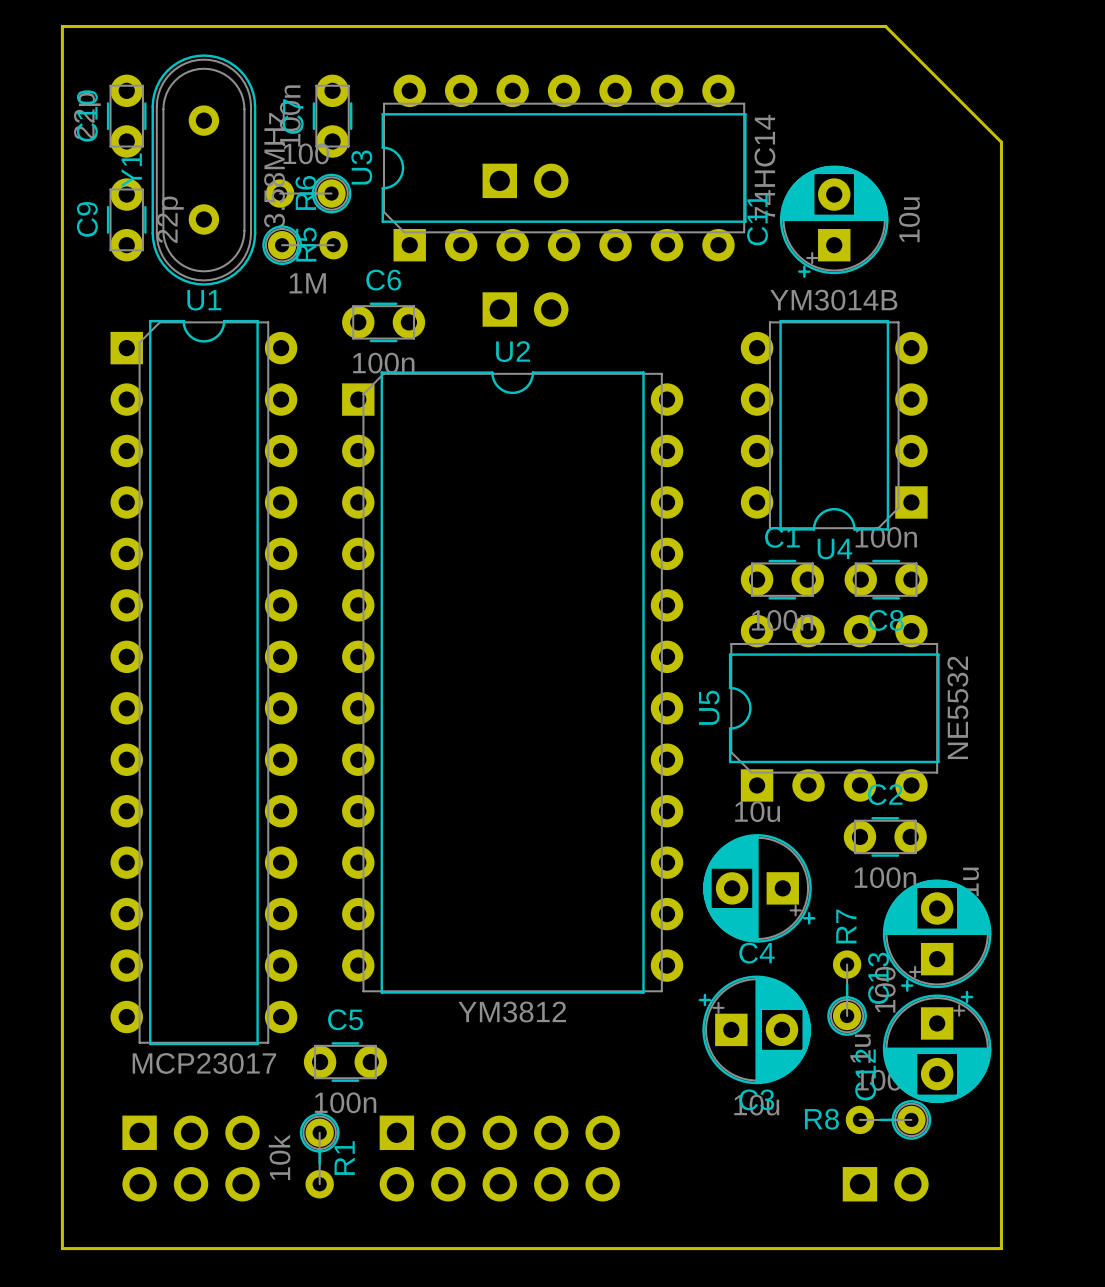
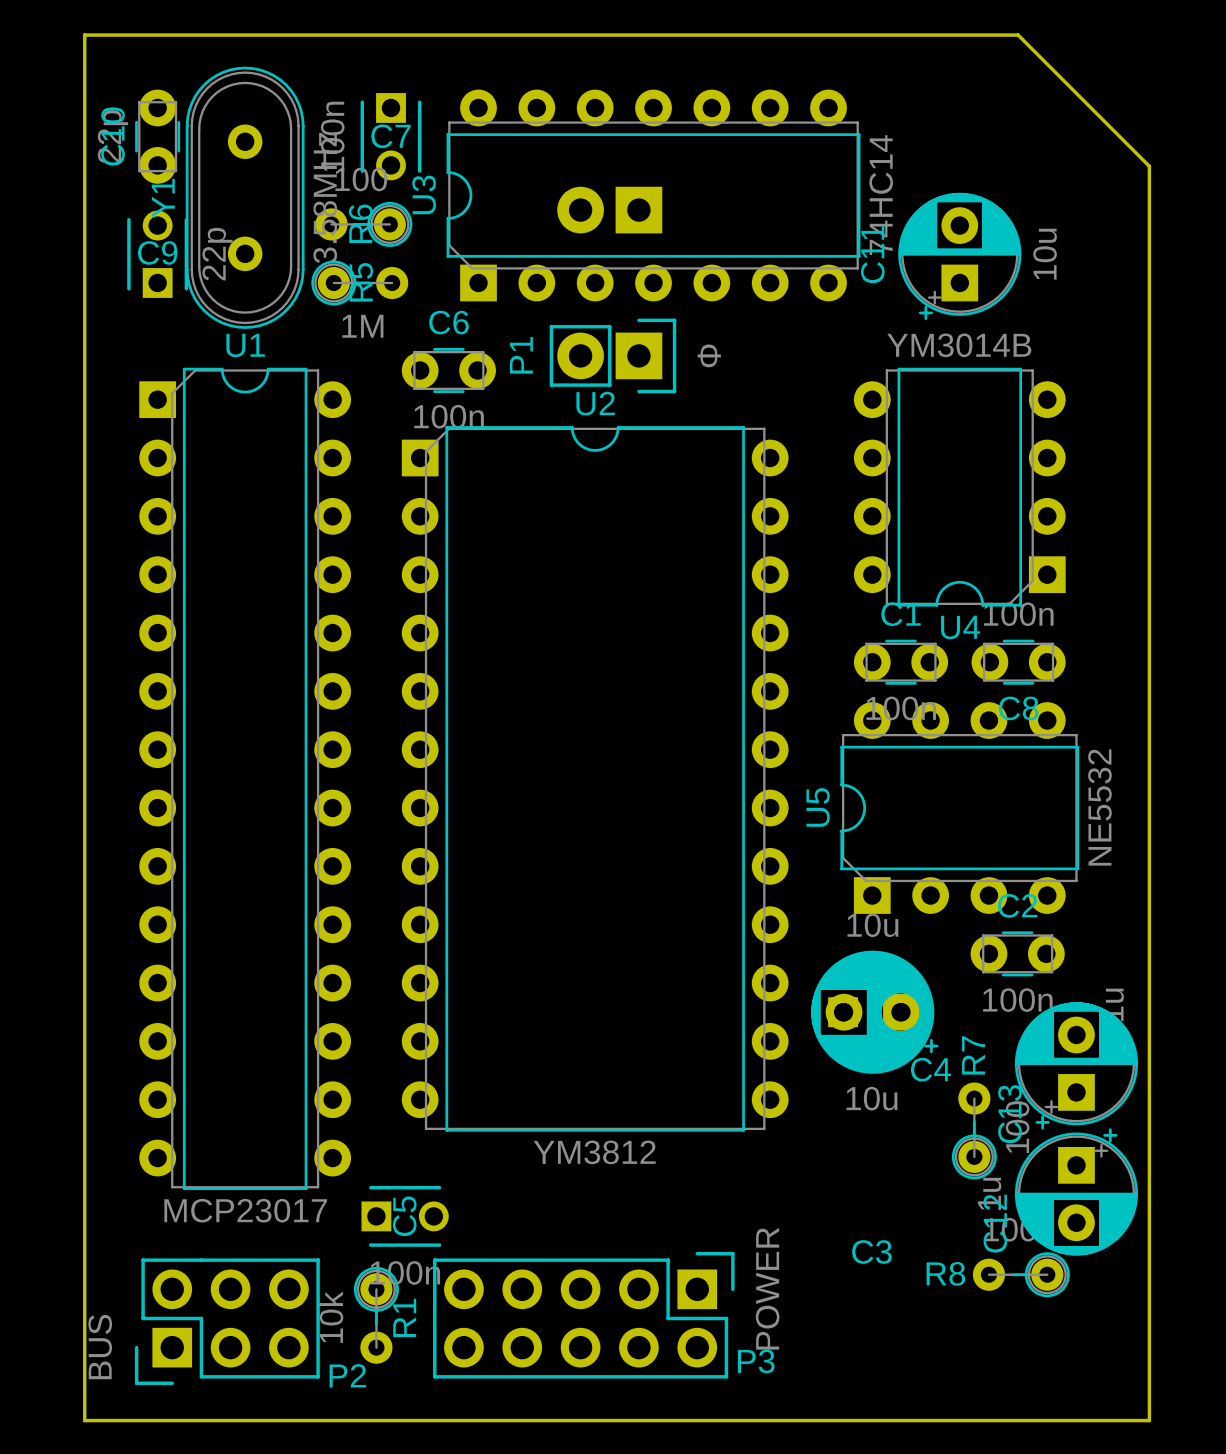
C7 footprint: [312, 74, 353, 158] -> [360, 93, 422, 181]
part footprint: [482, 163, 569, 199] -> [557, 186, 663, 234]
C9 footprint: [106, 178, 147, 262] -> [127, 210, 189, 298]
part: (525, 309) -> none
P1: none -> Φ (612, 355)
C4 name position: C4 (756, 953) -> C4 (930, 1069)
C4 footprint: [698, 975, 811, 1085] -> [811, 952, 932, 1073]
C5 name position: C5 (345, 1019) -> C5 (404, 1216)
C5 footprint: [303, 1042, 387, 1082] -> [361, 1185, 449, 1247]
P3: none -> POWER (583, 1315)
part: (191, 1158) -> none
part: (499, 1158) -> none
P2: none -> BUS (227, 1321)
part: (885, 1184) -> none

